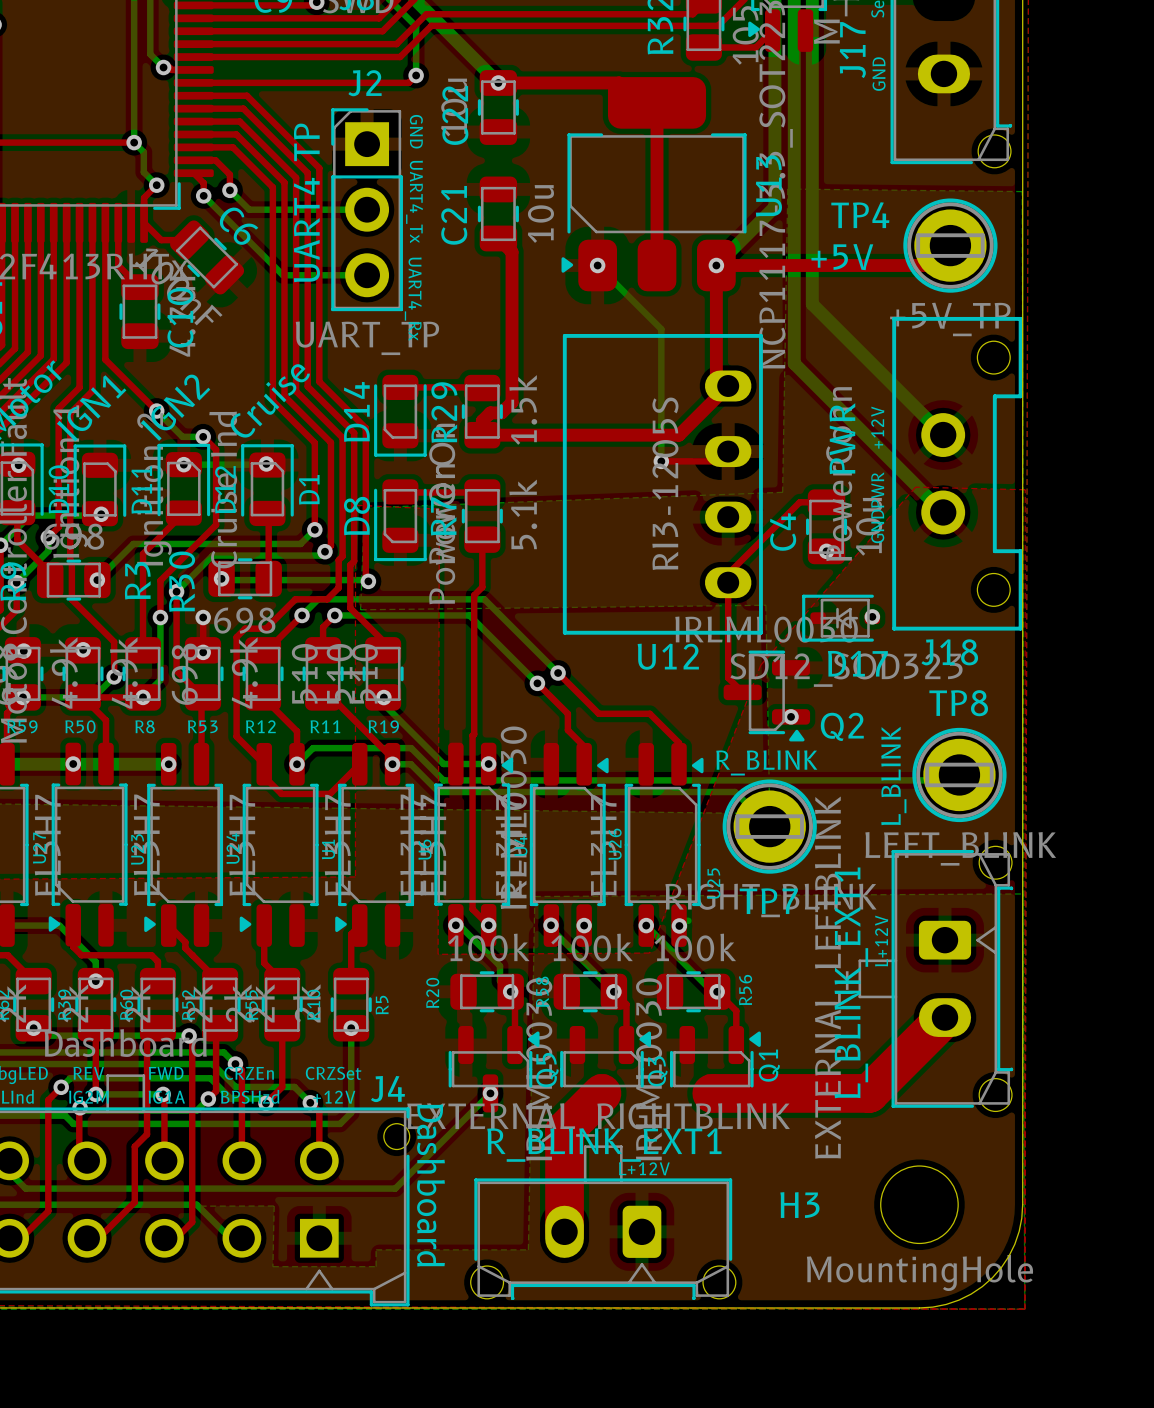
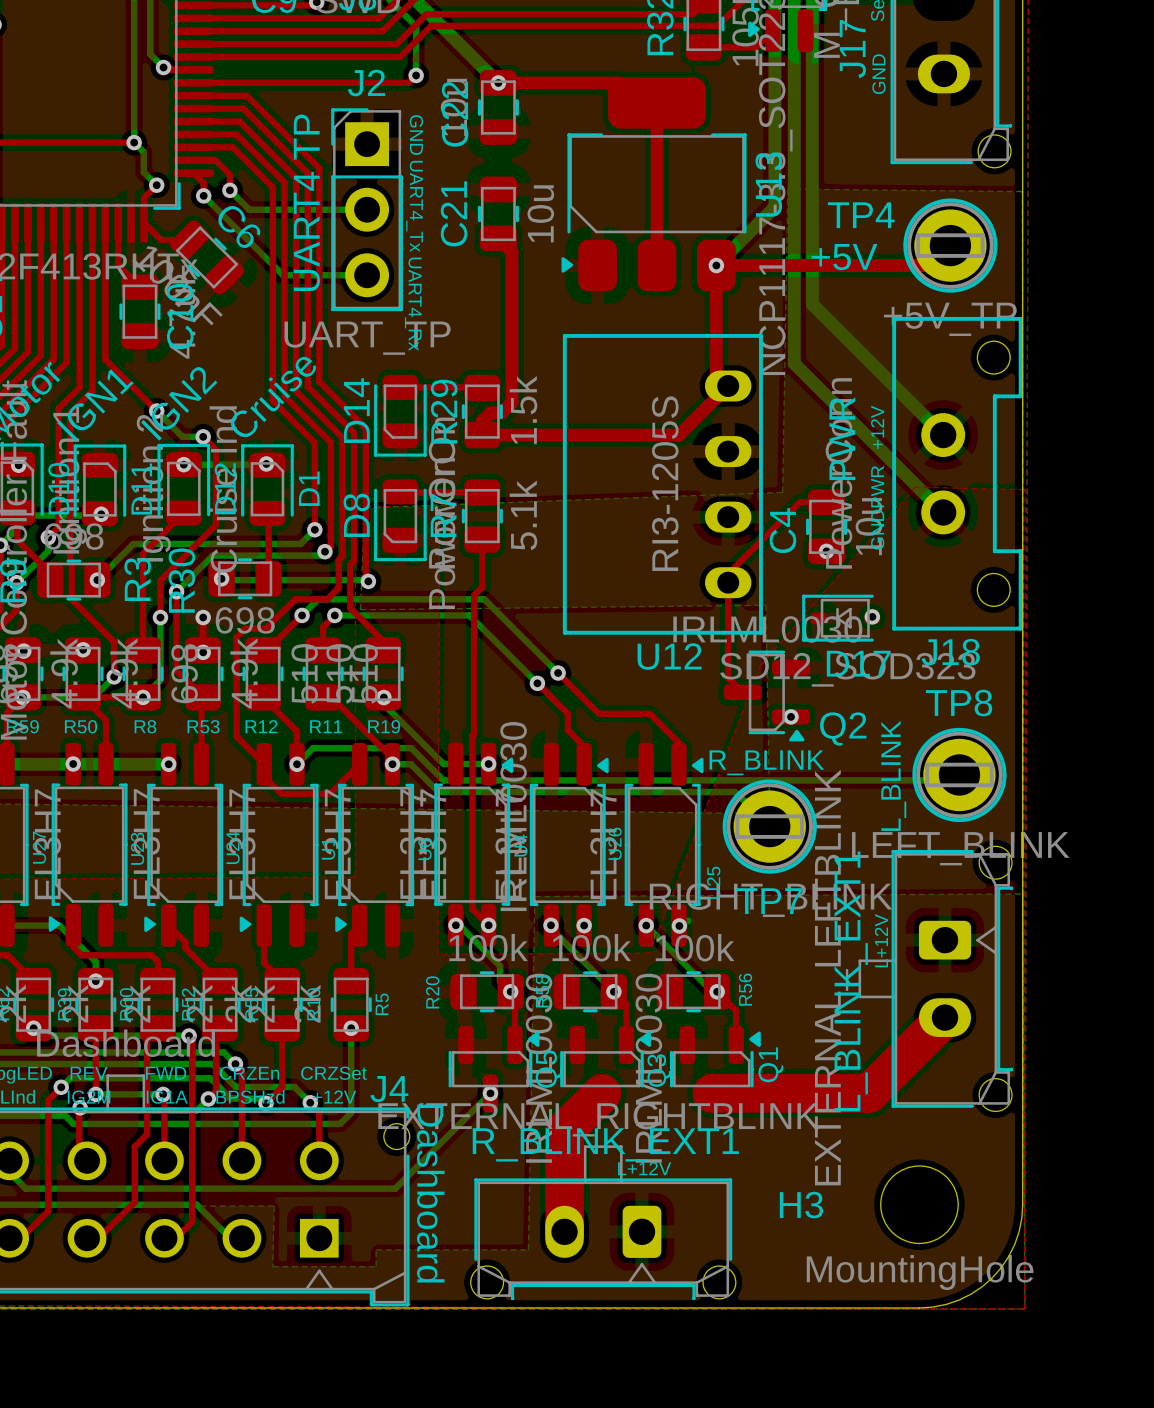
bottom track: (597, 265) (661, 329) (661, 461) -> none
via: (597, 265) -> none
top track: (661, 461) (713, 461) -> none
via: (661, 461) -> none

